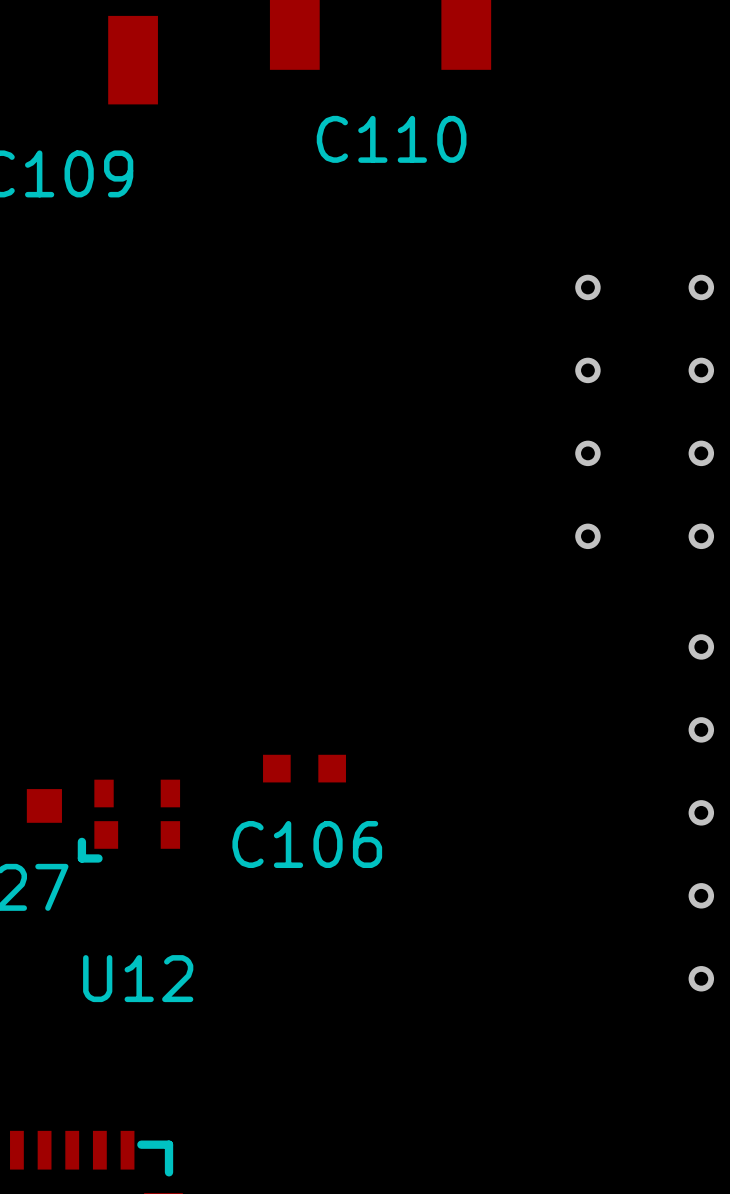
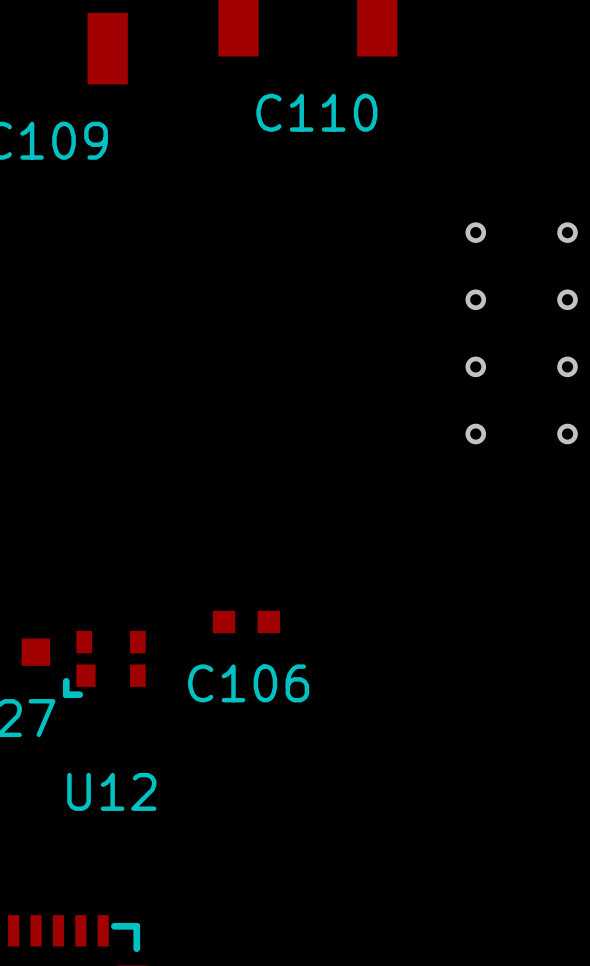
via: (701, 646) -> none
via: (701, 729) -> none
via: (701, 812) -> none
via: (701, 895) -> none
via: (701, 978) -> none

